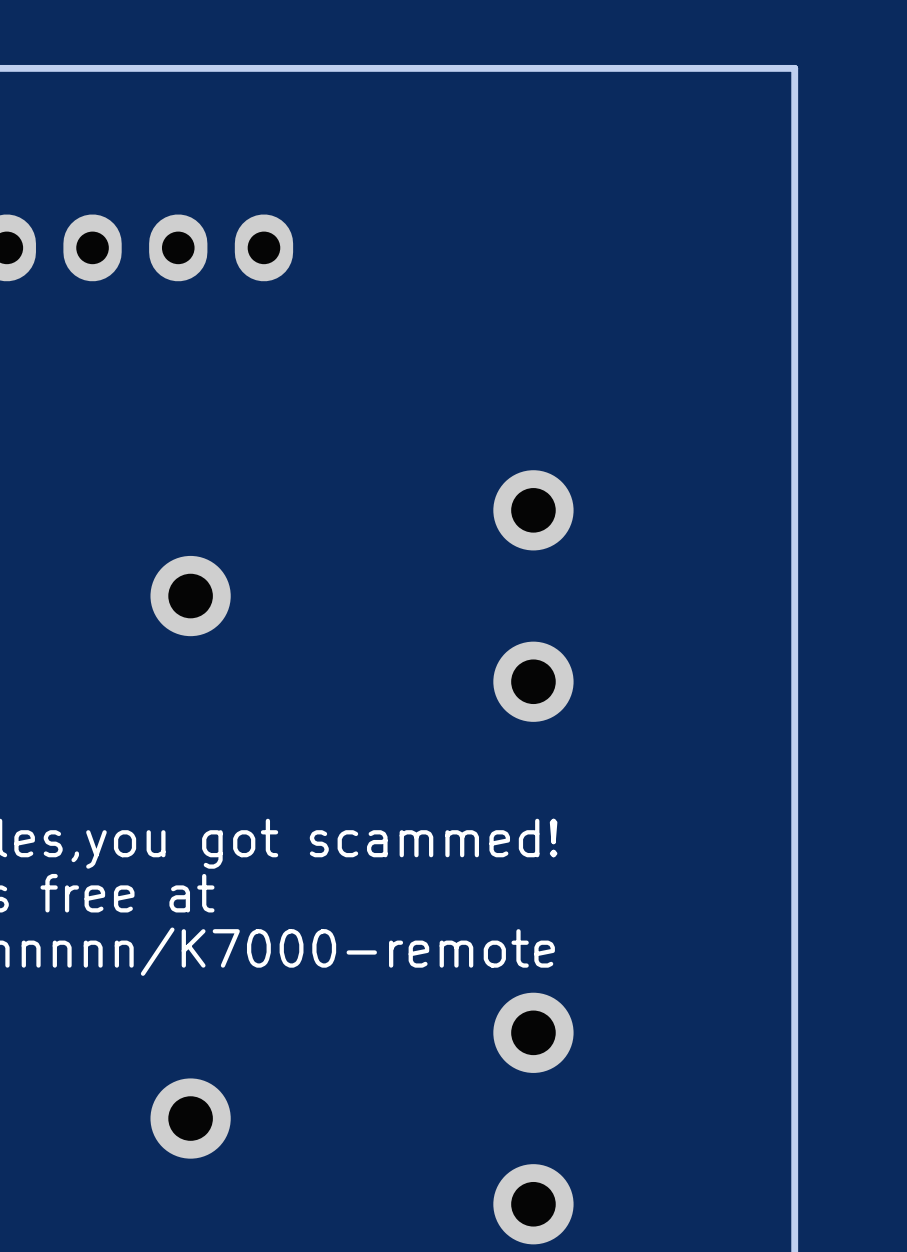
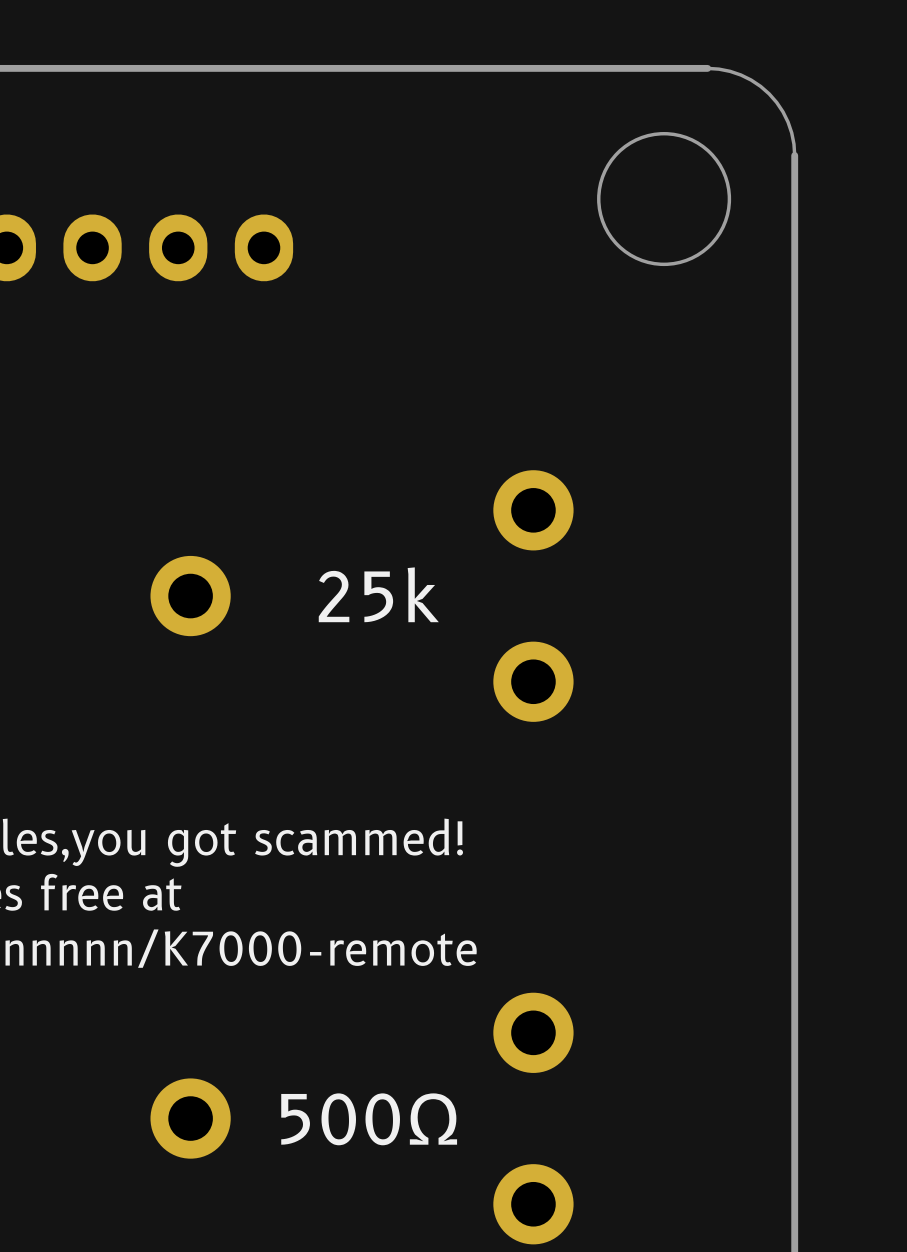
board edge: (707, 68) (794, 68) (794, 155) -> (707, 68) (740, 75) (769, 93) (788, 122) (794, 155)
round board edge: none -> [597, 131, 732, 267]
text: none -> 25k (378, 594)
text: none -> 500Ω (369, 1119)

